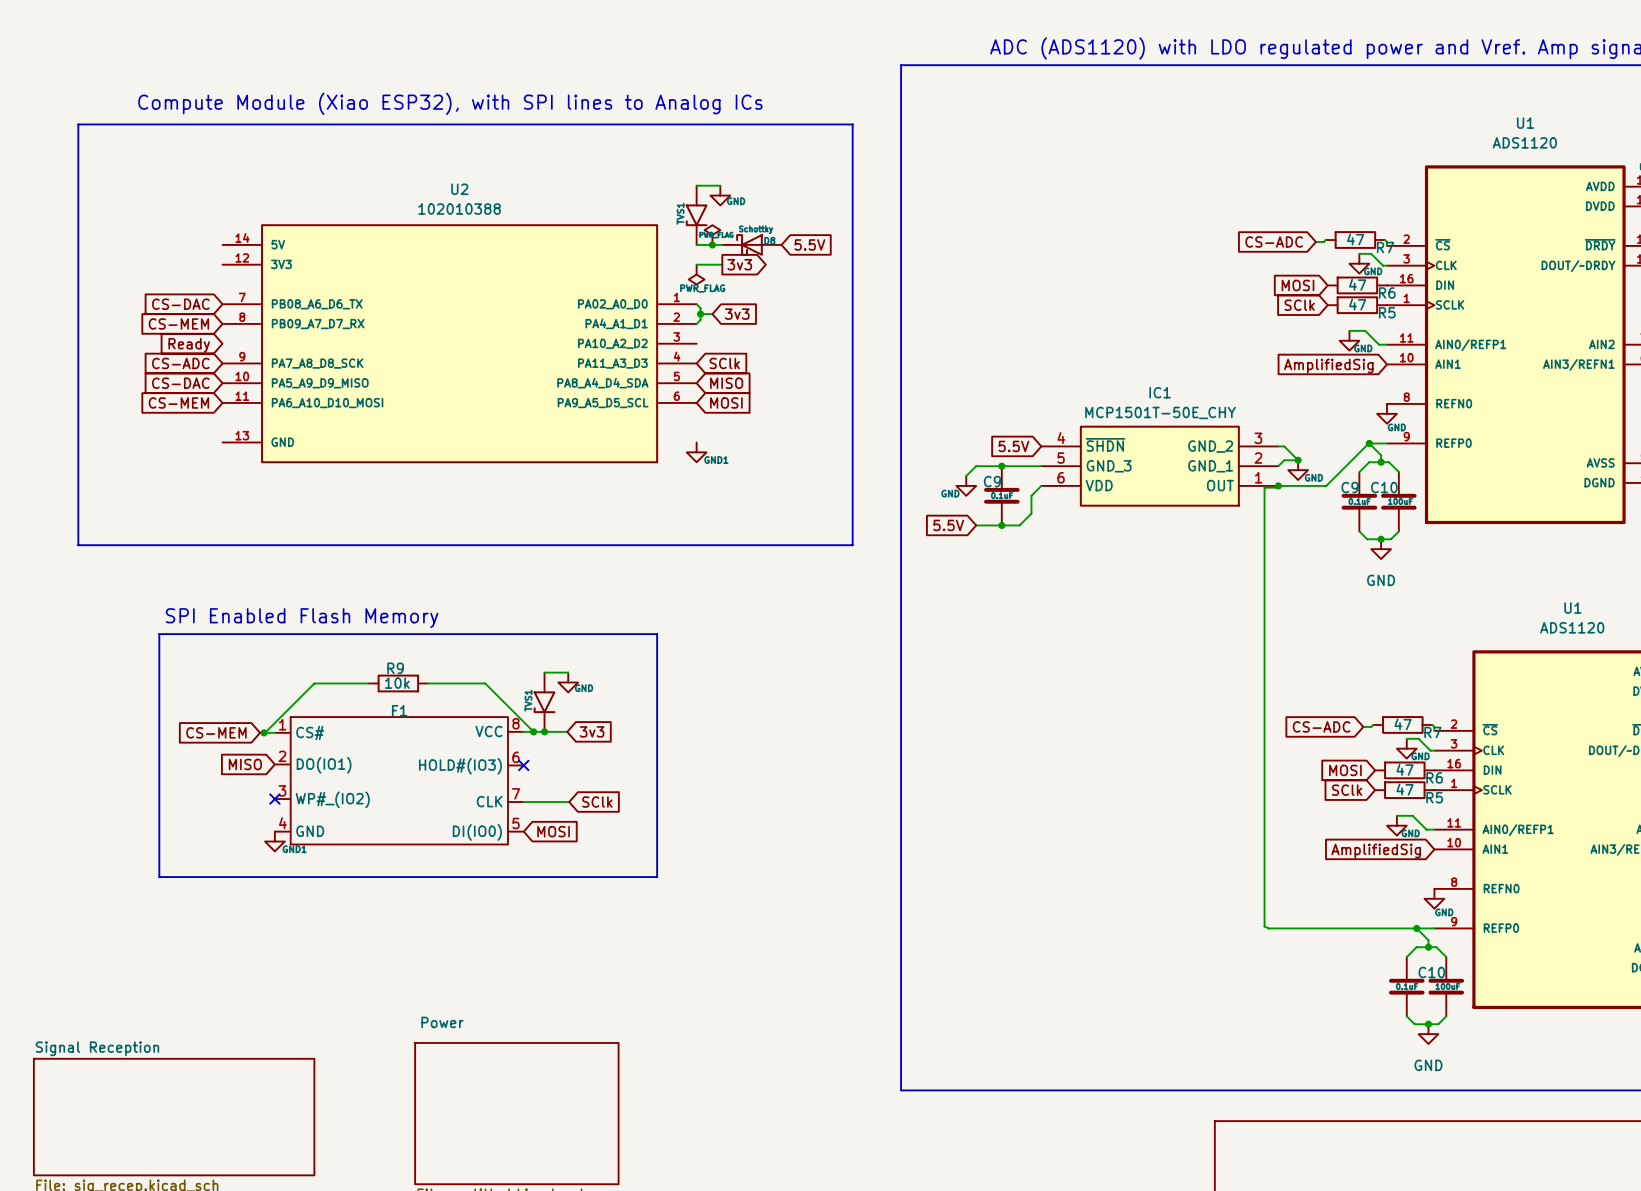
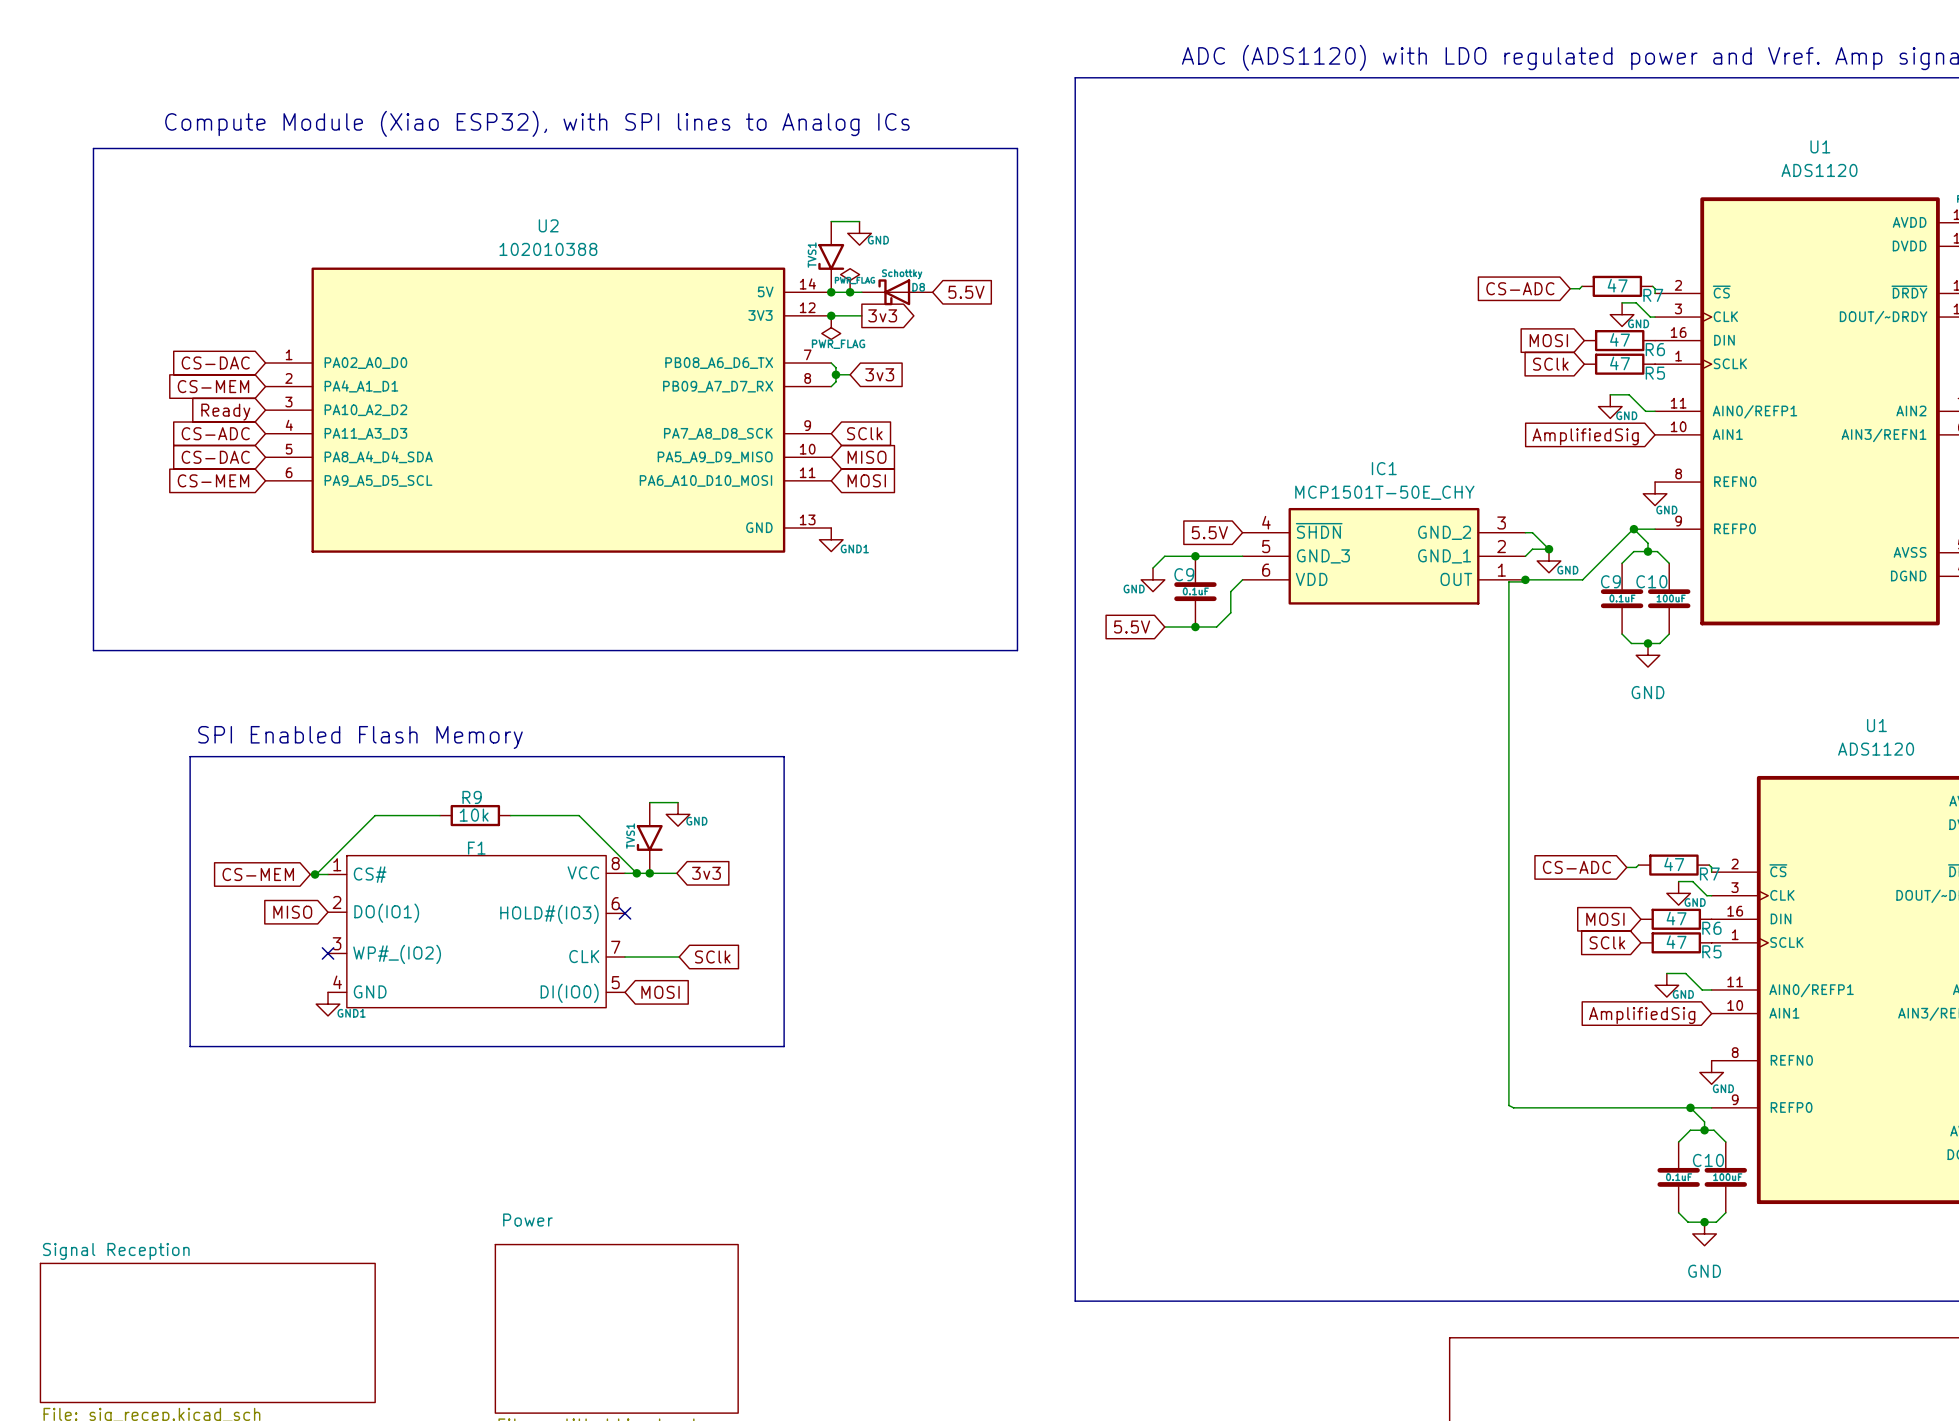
junction: none -> (831, 292)
junction: none -> (831, 315)
U2 flip: as is (459, 343) -> left-right (548, 410)

